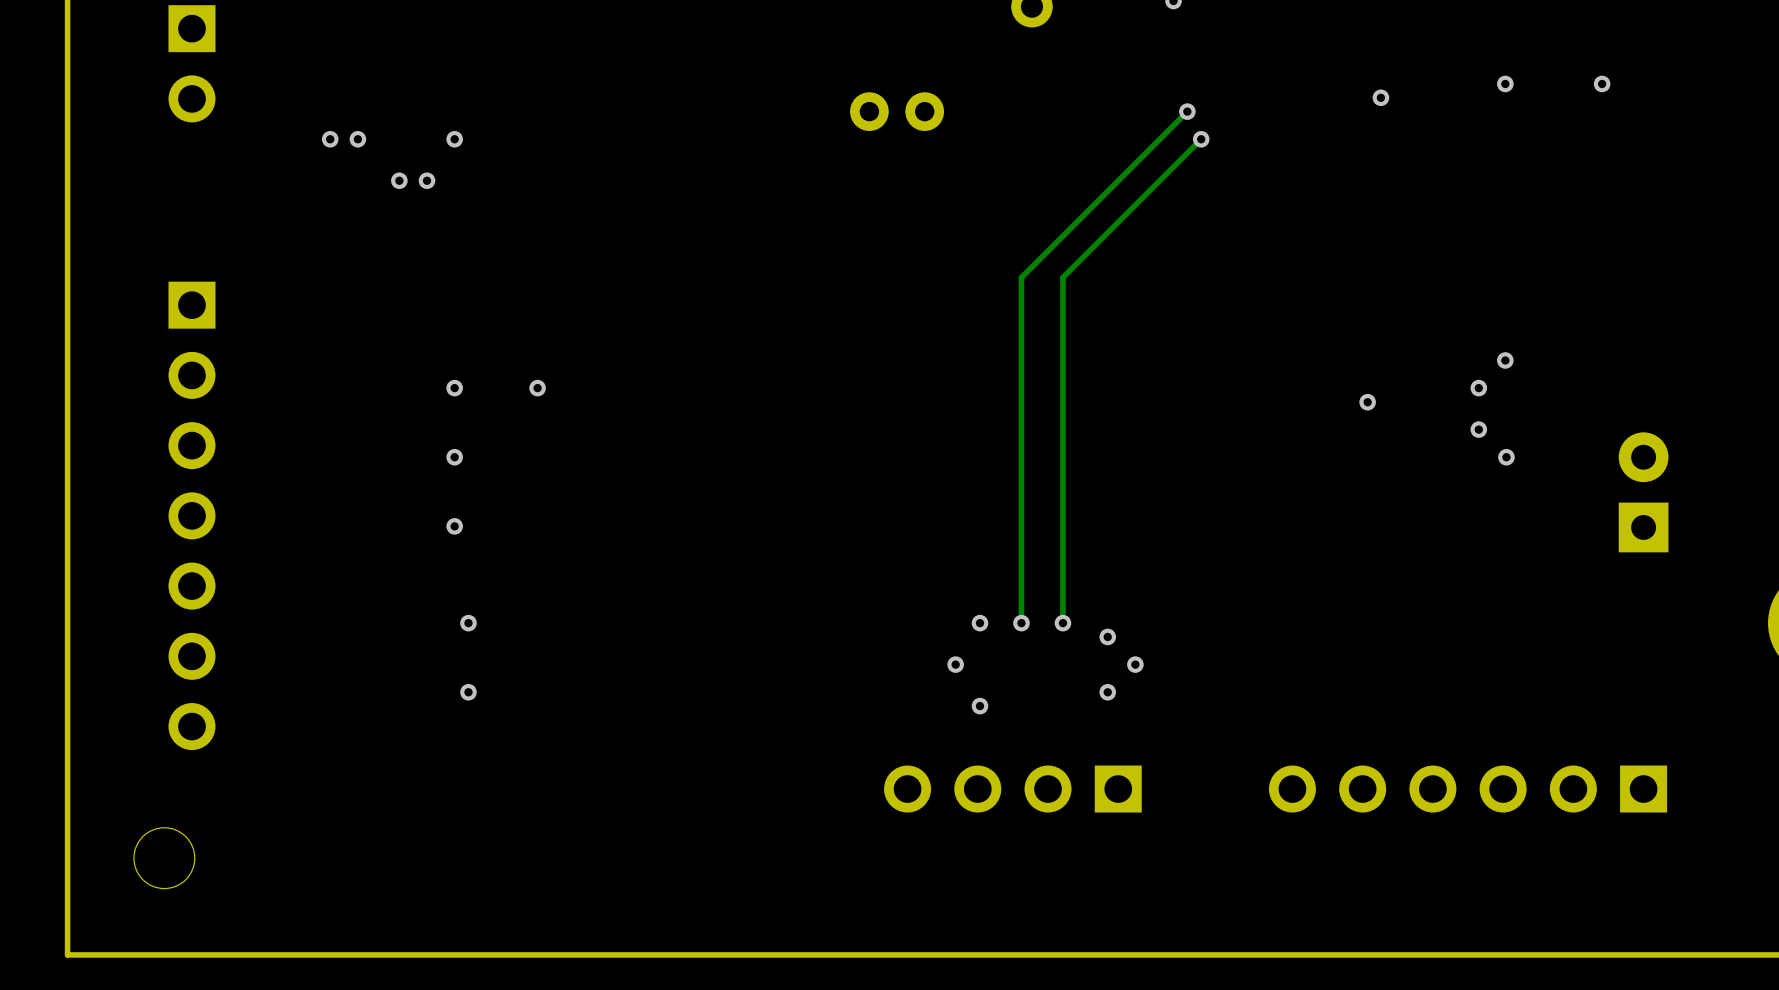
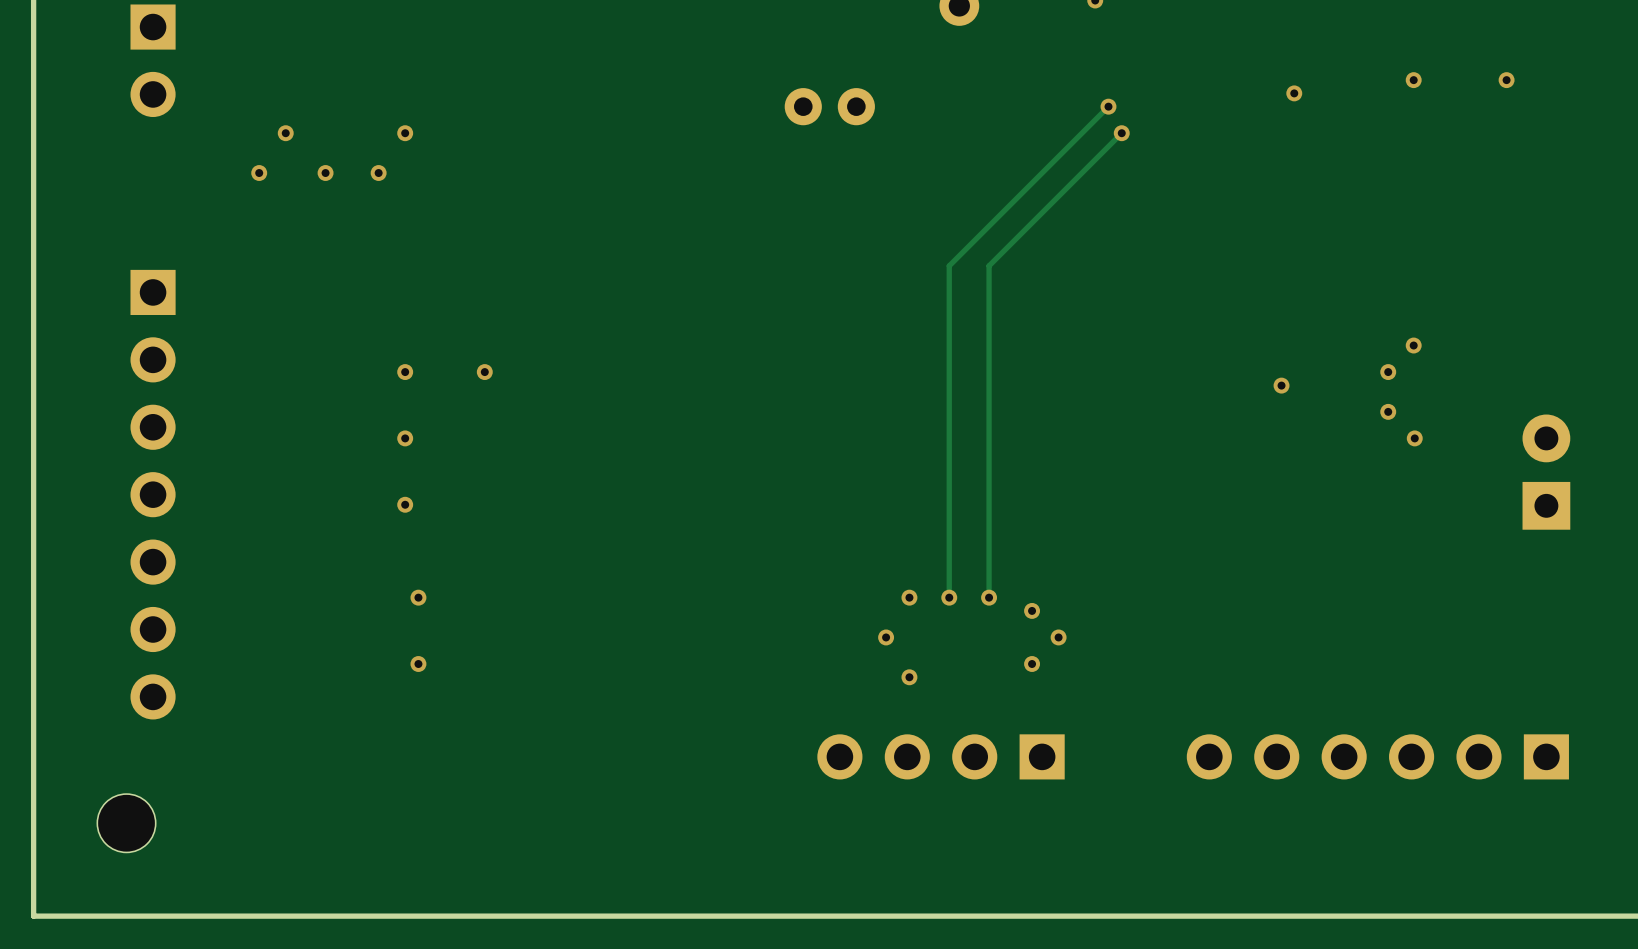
via: (357, 139) -> none
via: none -> (259, 173)
via: none -> (325, 173)
via: (399, 180) -> none

